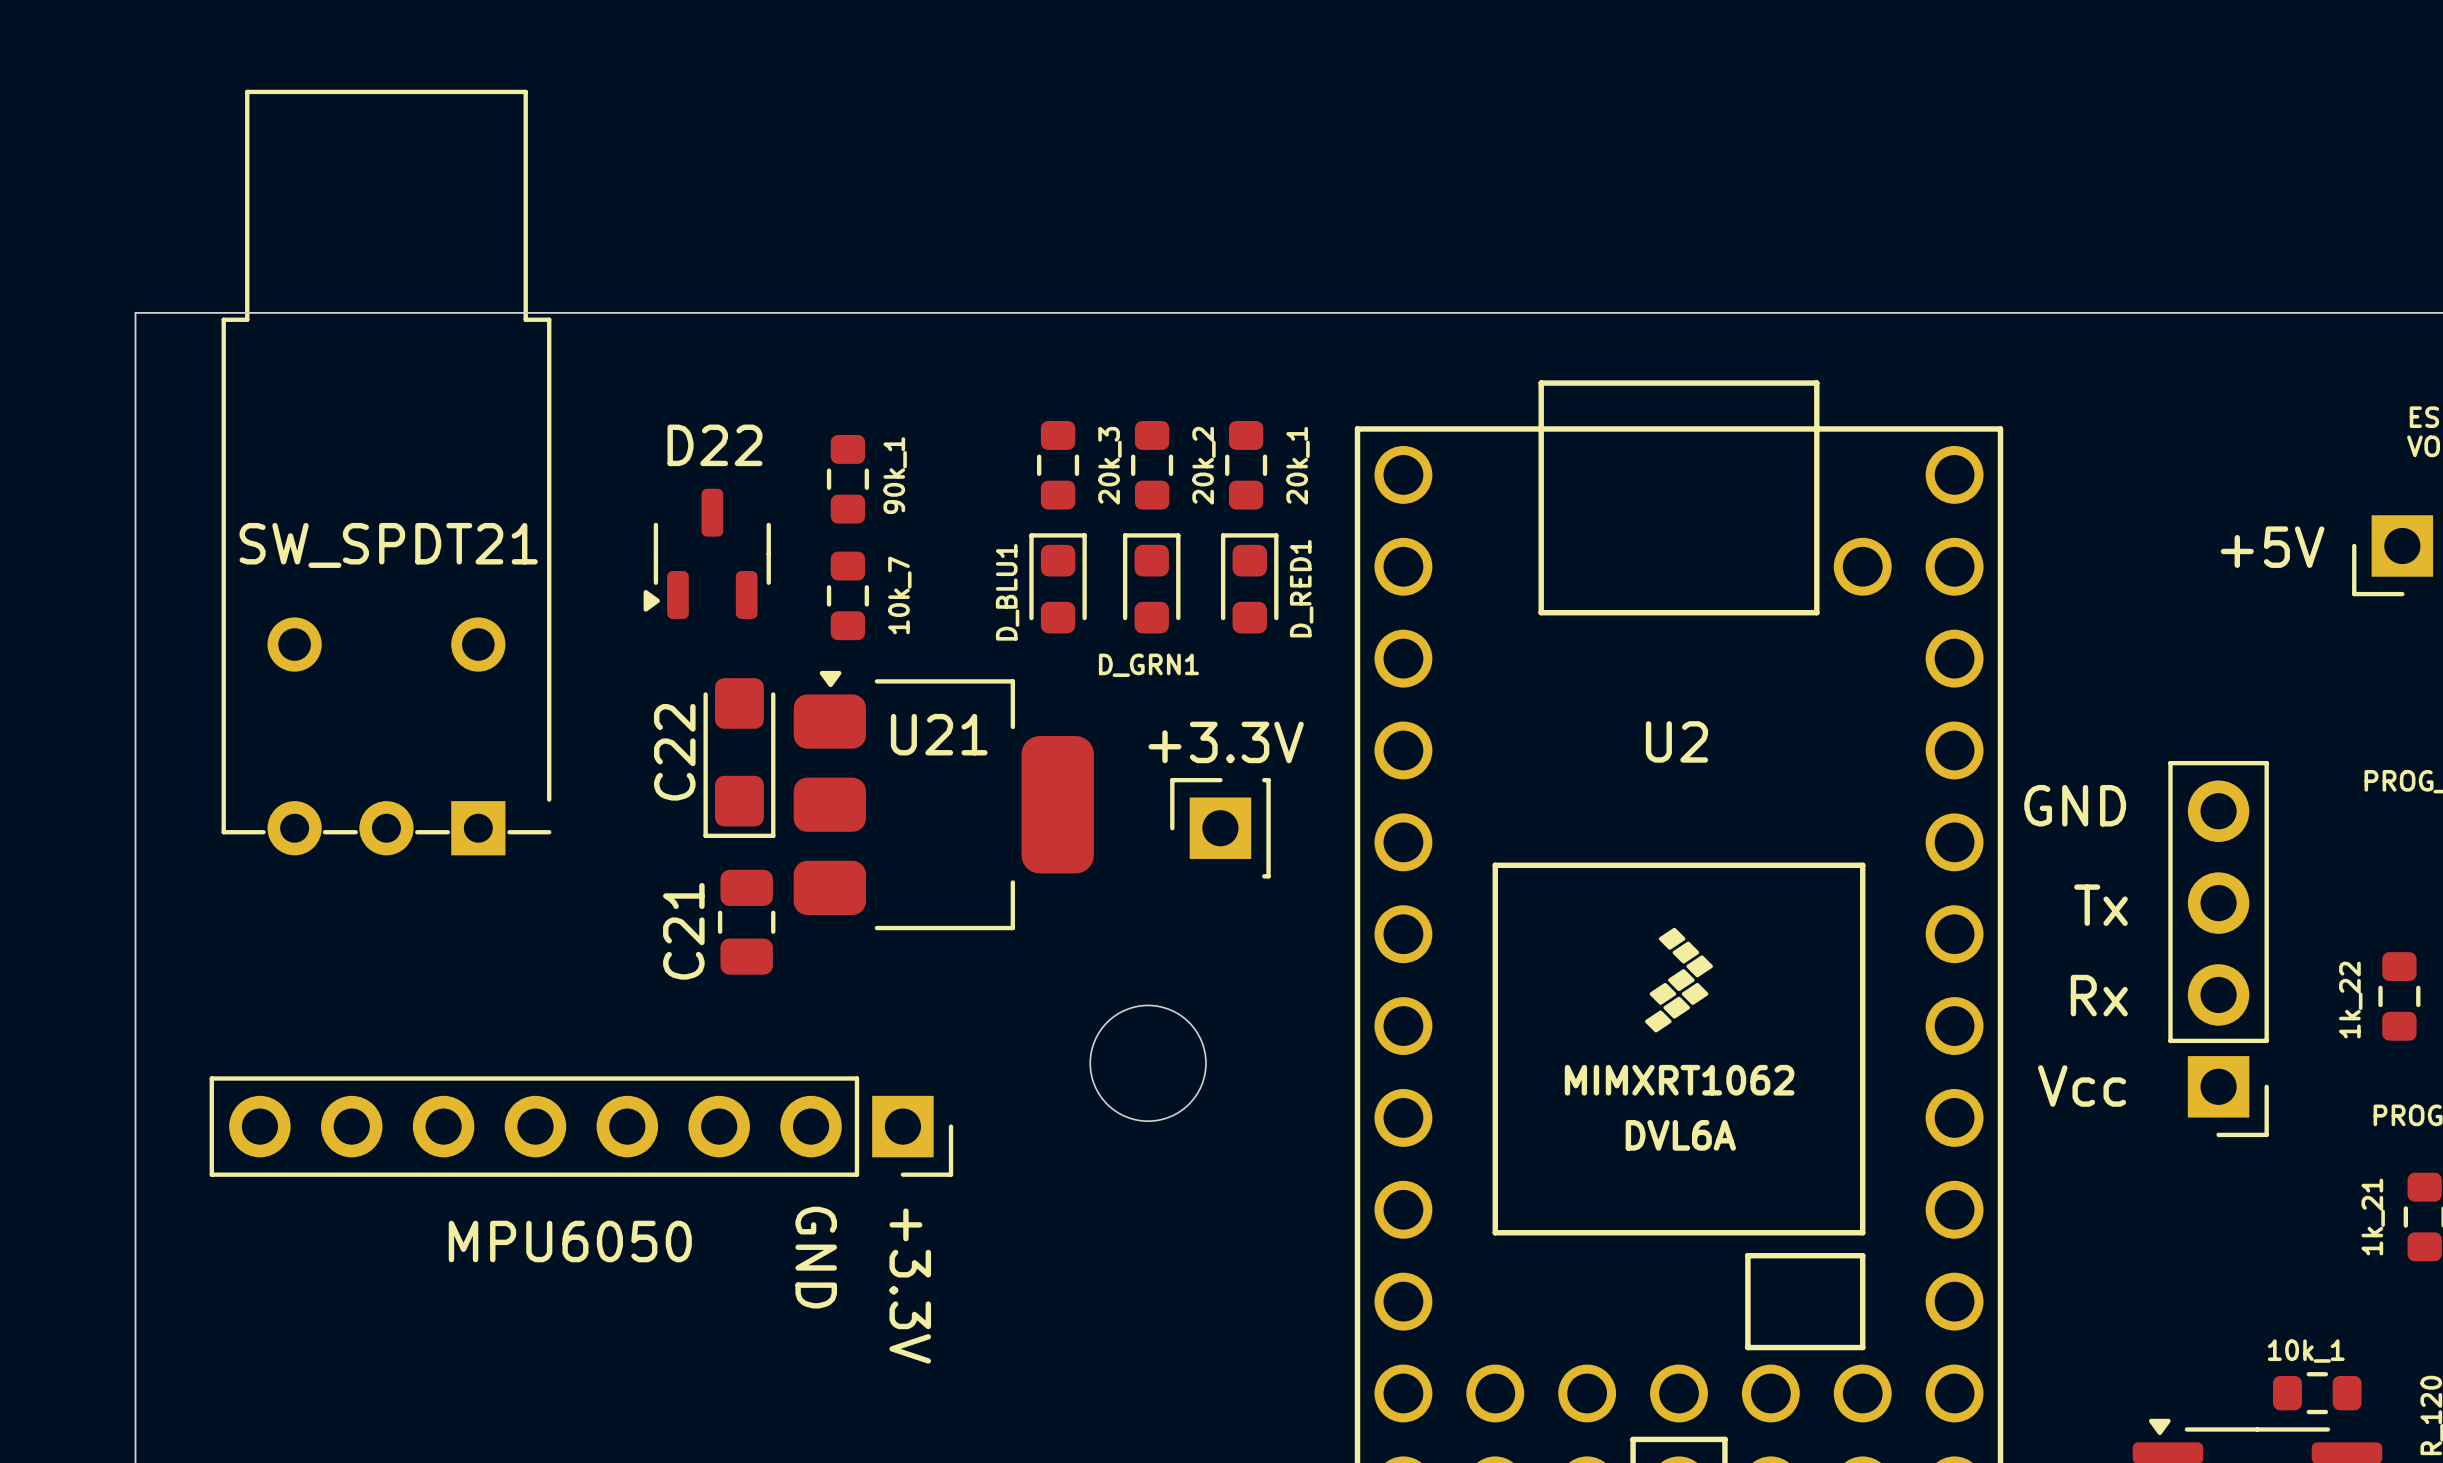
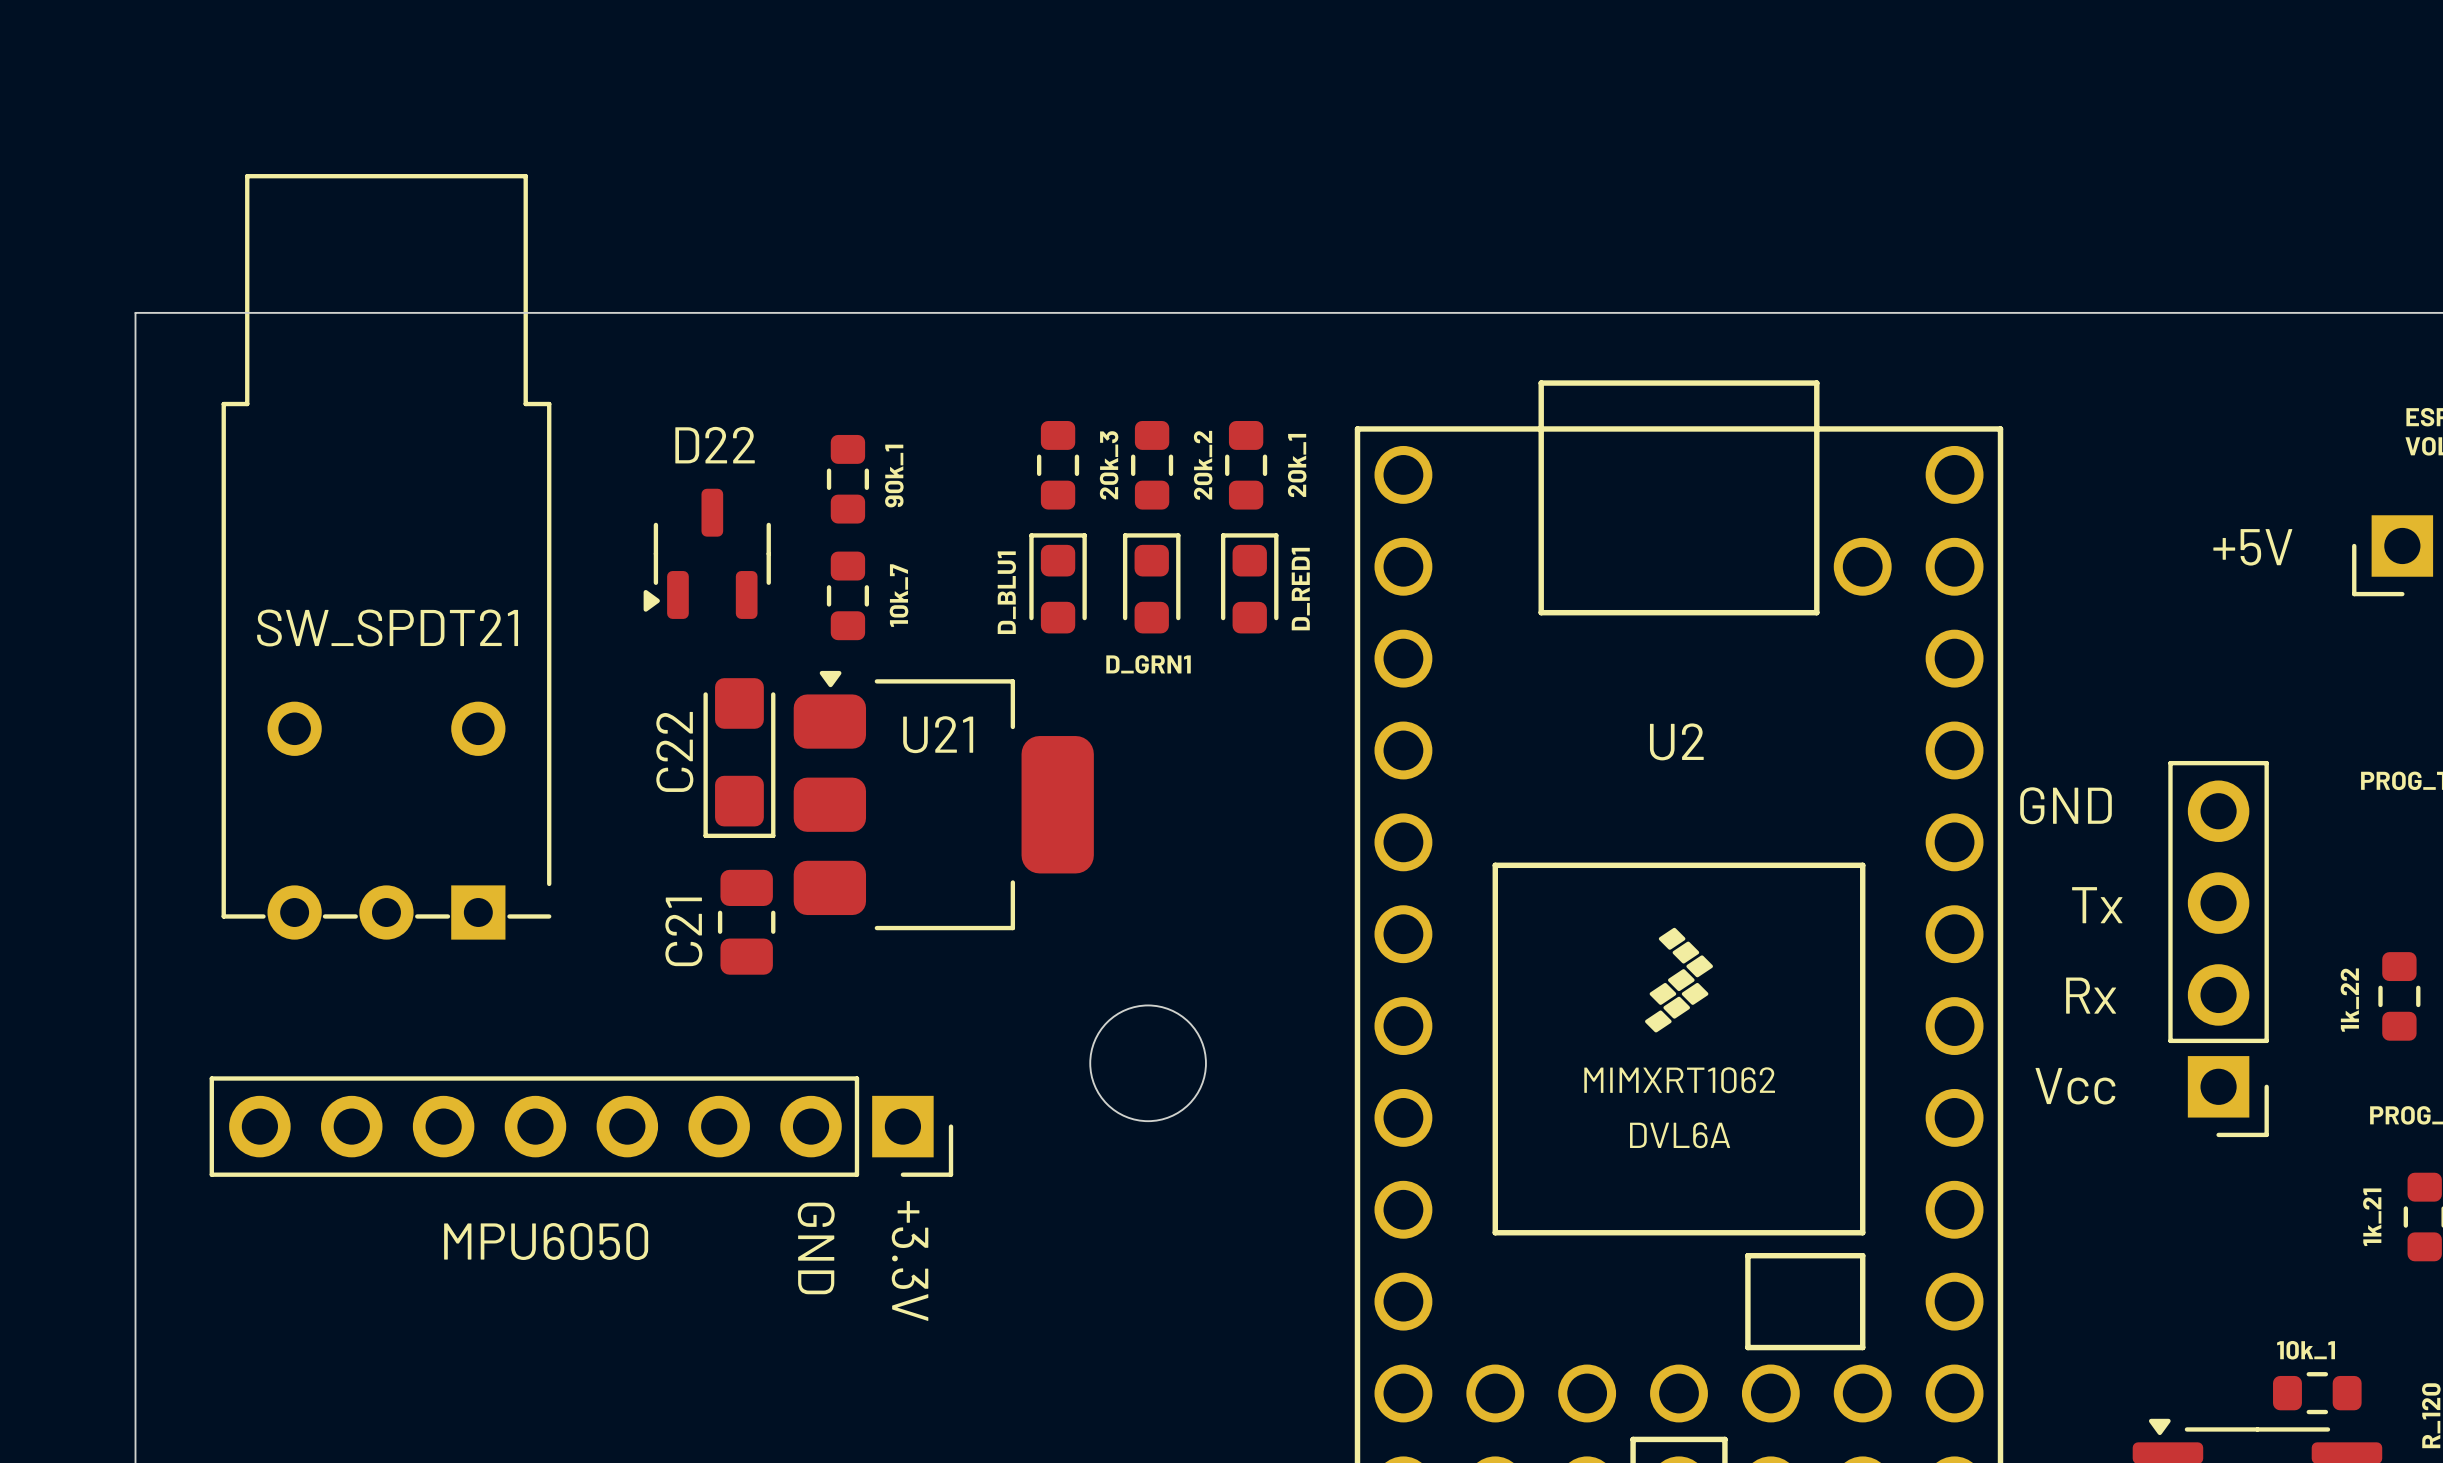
SW_SPDT21 position: (386, 472) -> (386, 556)
text: +3.3V (1226, 742) -> none
part: (1220, 828) -> none

